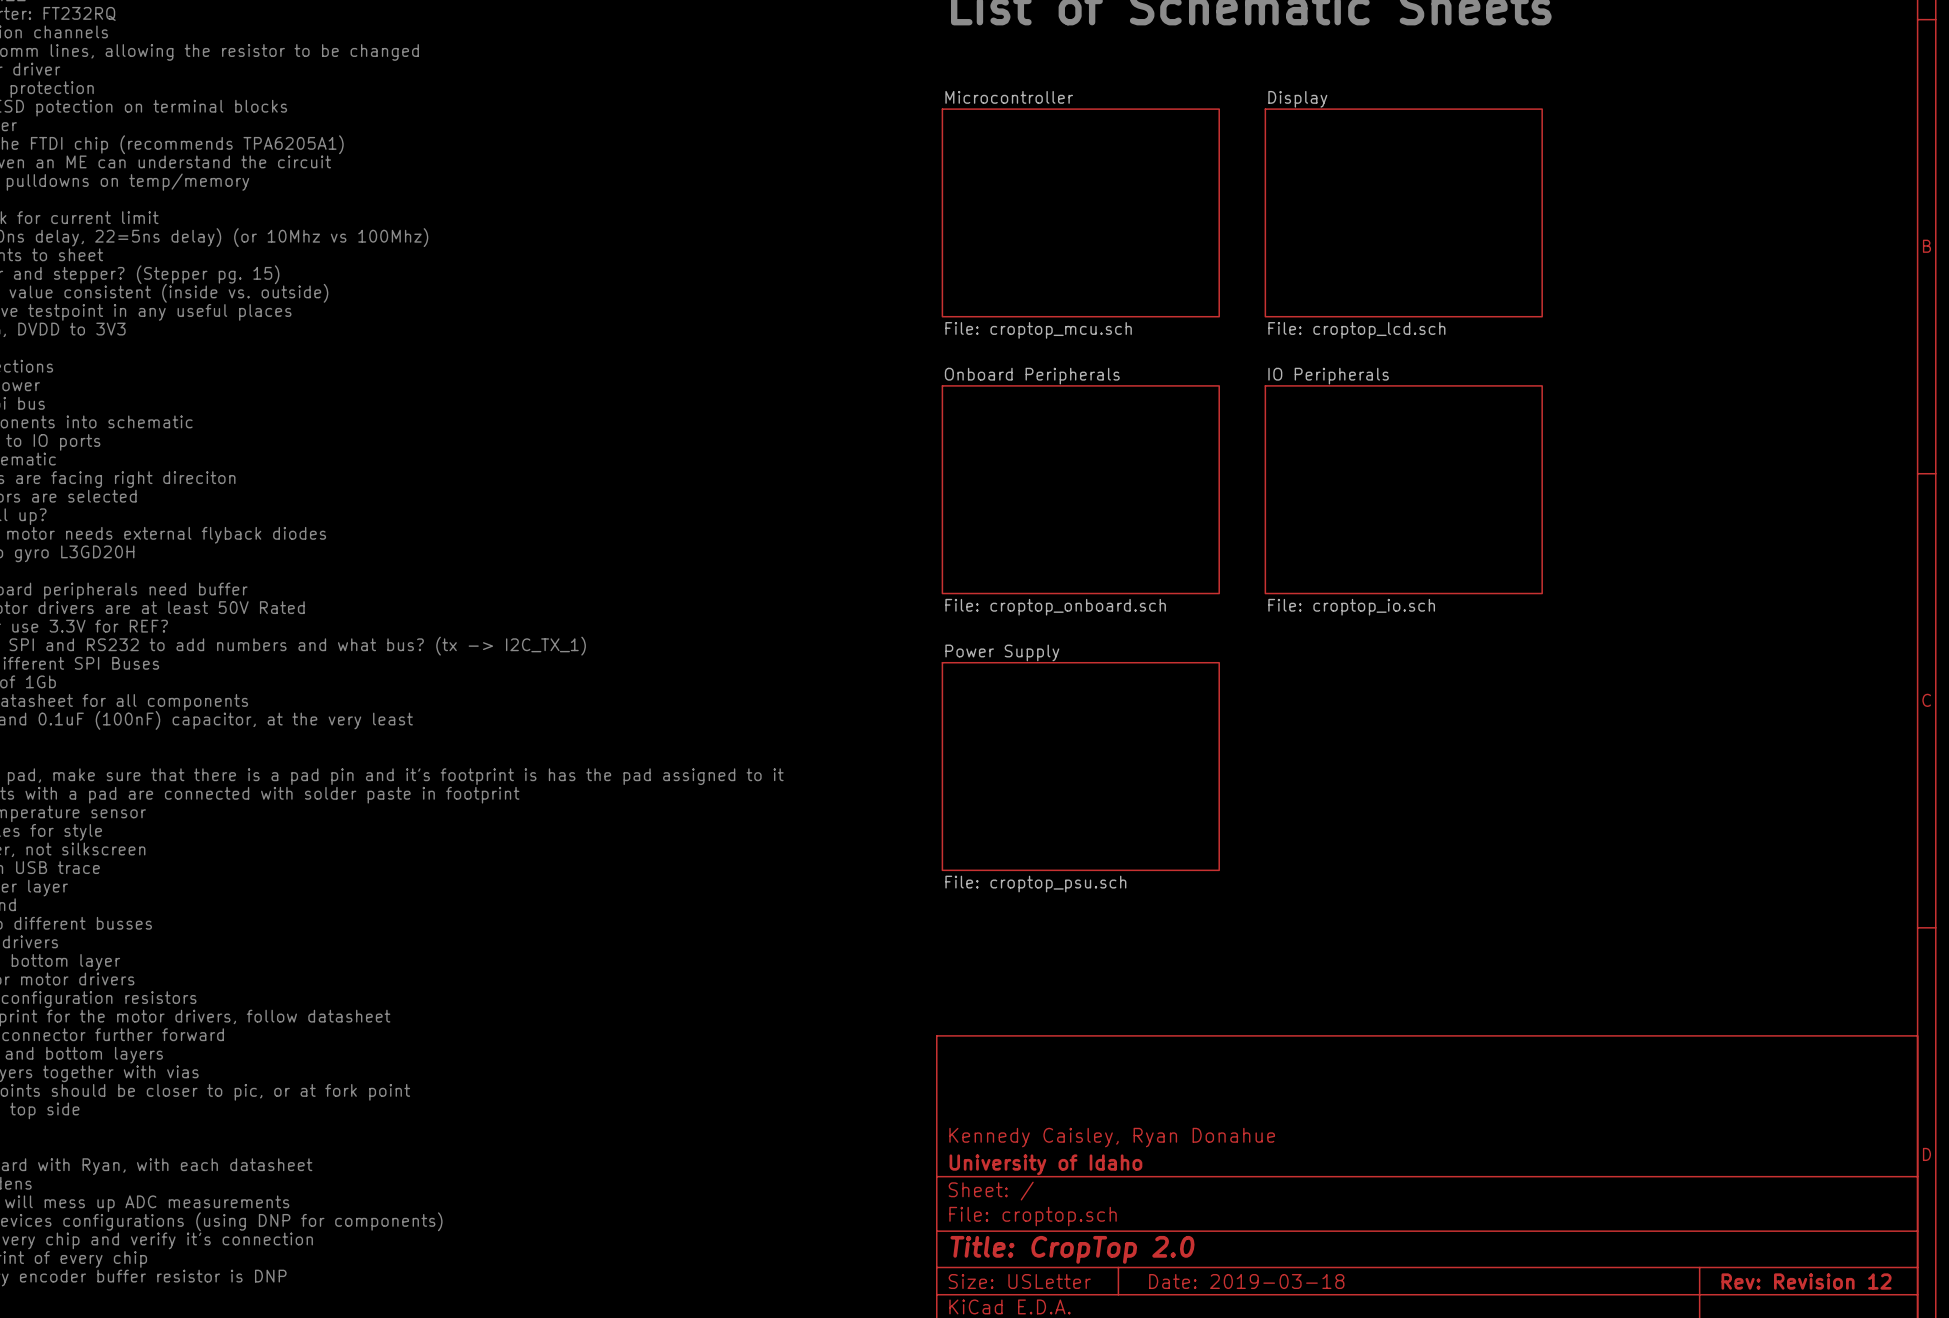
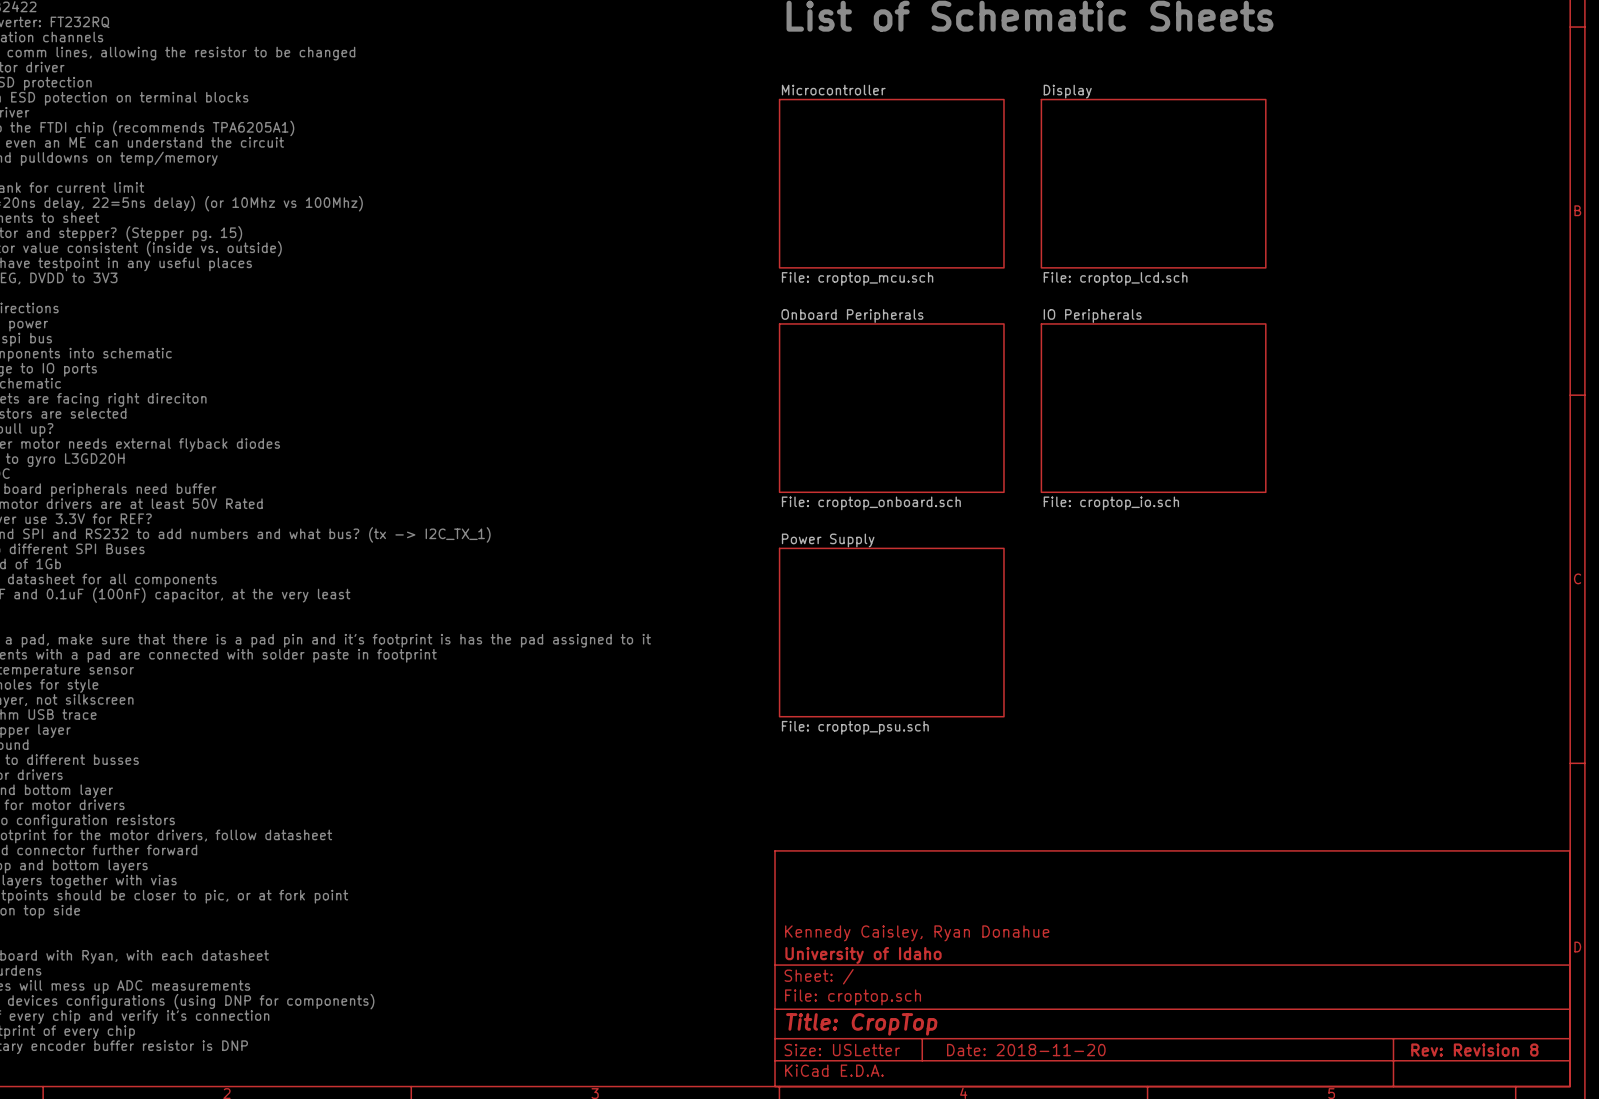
title block: Title: CropTop 2.0 (1072, 1249) -> Title: CropTop (861, 1024)
title block: Date: 2019-03-18 (1246, 1281) -> Date: 2018-11-20 (1026, 1050)
title block: Rev: Revision 12 (1806, 1281) -> Rev: Revision 8 (1474, 1050)

